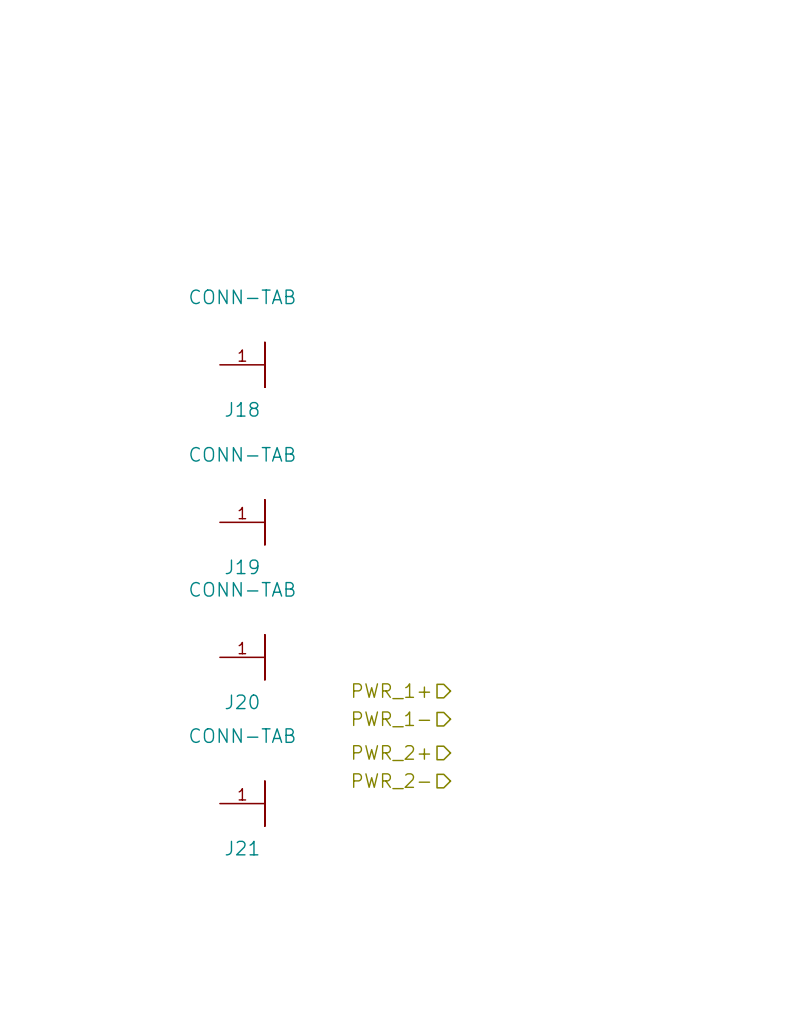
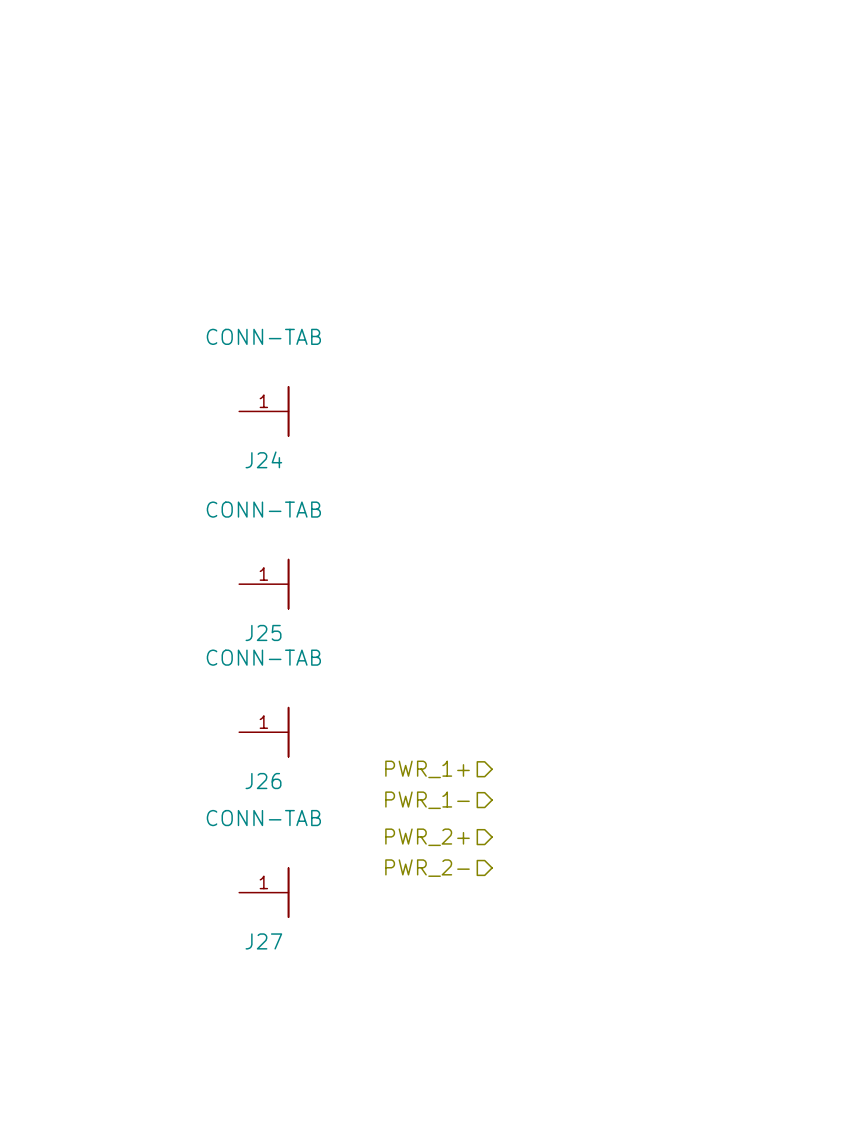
J18 name: J18 (242, 409) -> J24 (263, 459)
J19 name: J19 (242, 566) -> J25 (263, 632)
J20 name: J20 (242, 701) -> J26 (263, 781)
J21 name: J21 (242, 848) -> J27 (263, 941)

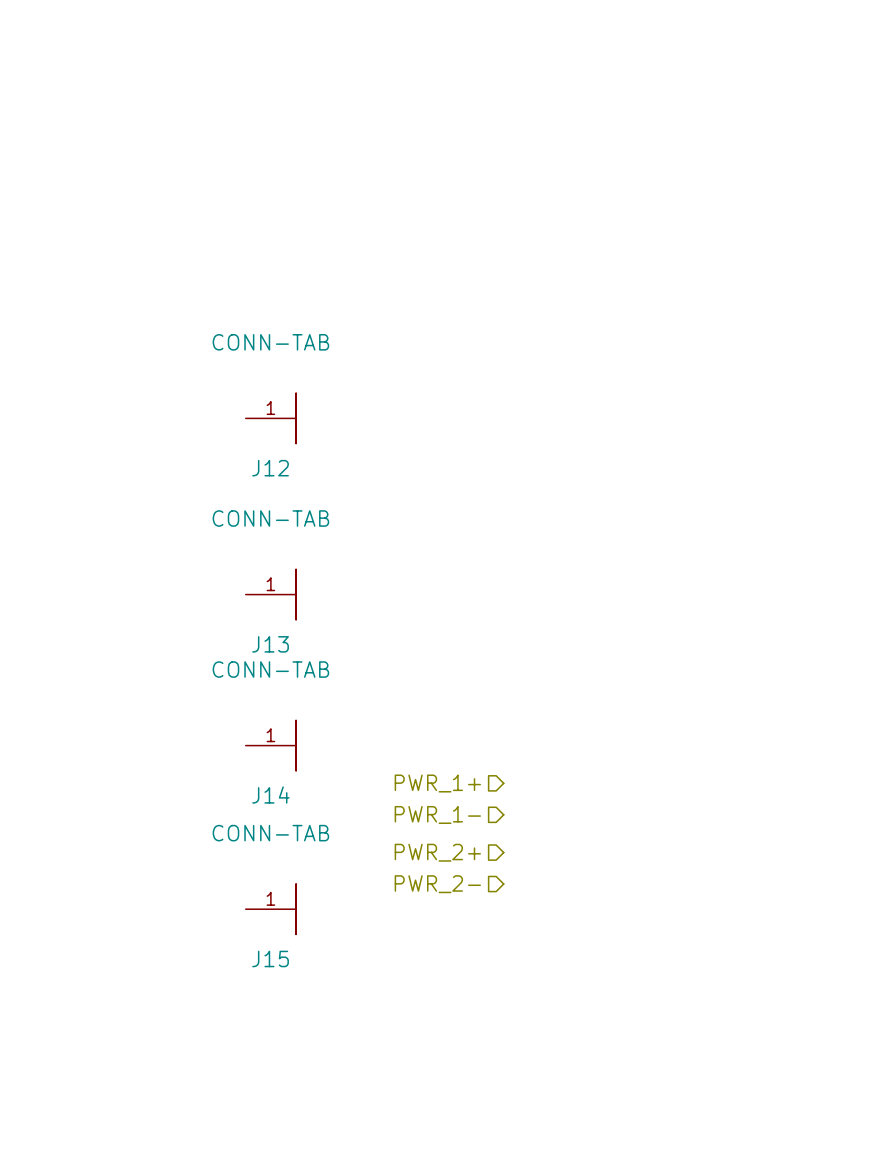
J24 name: J24 (263, 459) -> J12 (270, 468)
J25 name: J25 (263, 632) -> J13 (270, 644)
J26 name: J26 (263, 781) -> J14 (270, 795)
J27 name: J27 (263, 941) -> J15 (270, 958)

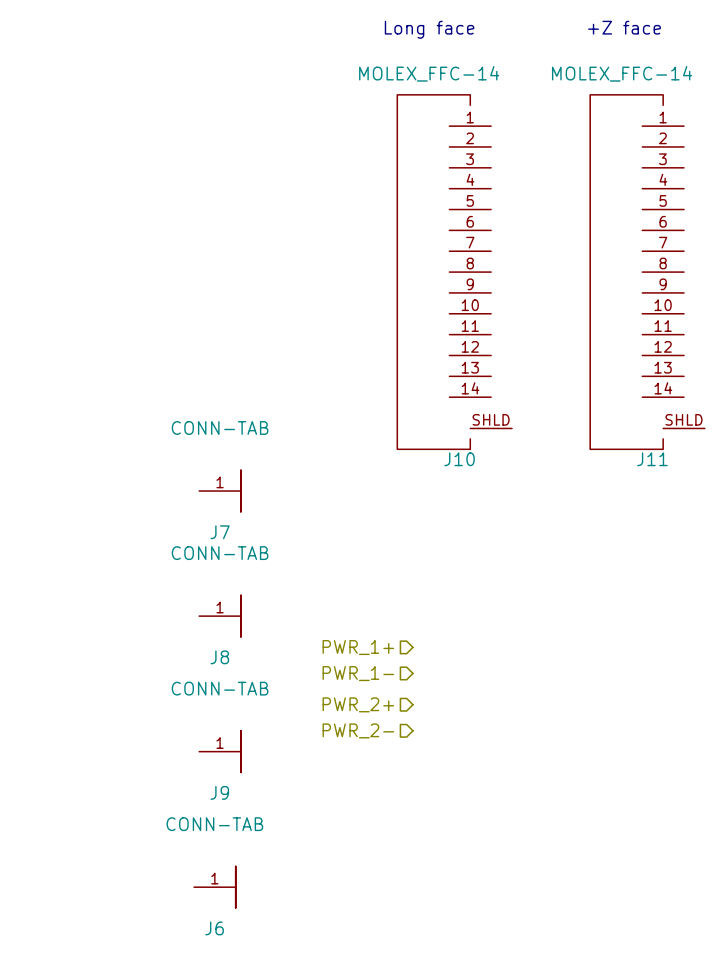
text: none -> +Z face (624, 27)
text: none -> Long face (429, 29)
J10: none -> MOLEX_FFC-14 (454, 272)
J11: none -> MOLEX_FFC-14 (647, 272)
J12: CONN-TAB (270, 418) -> none
J13 name: J13 (270, 644) -> J7 (220, 532)
J14 name: J14 (270, 795) -> J8 (219, 657)
J15 name: J15 (270, 958) -> J9 (219, 792)
J6: none -> CONN-TAB (214, 887)

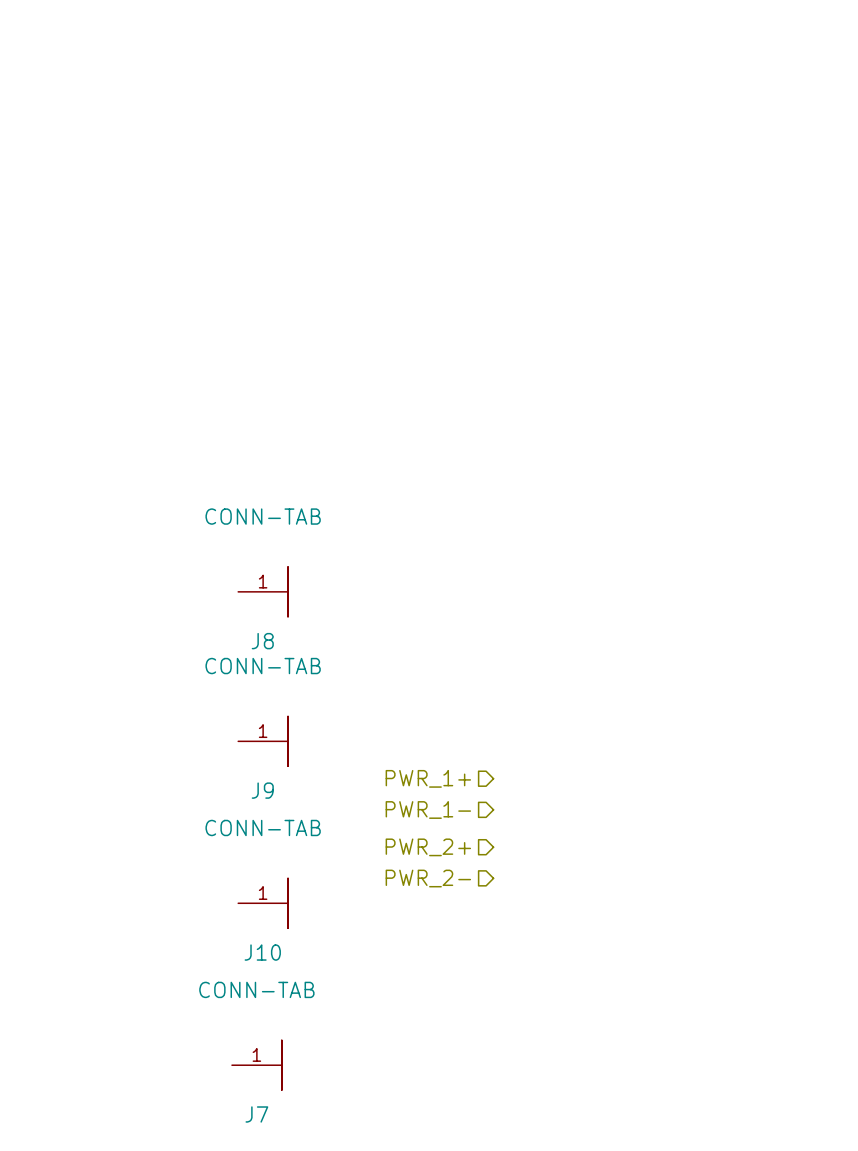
text: +Z face (624, 27) -> none
text: Long face (429, 29) -> none
J10: MOLEX_FFC-14 (454, 272) -> none
J11: MOLEX_FFC-14 (647, 272) -> none
J7 name: J7 (220, 532) -> J8 (262, 641)
J8 name: J8 (219, 657) -> J9 (262, 790)
J9 name: J9 (219, 792) -> J10 (262, 952)
J6 name: J6 (214, 928) -> J7 (256, 1114)

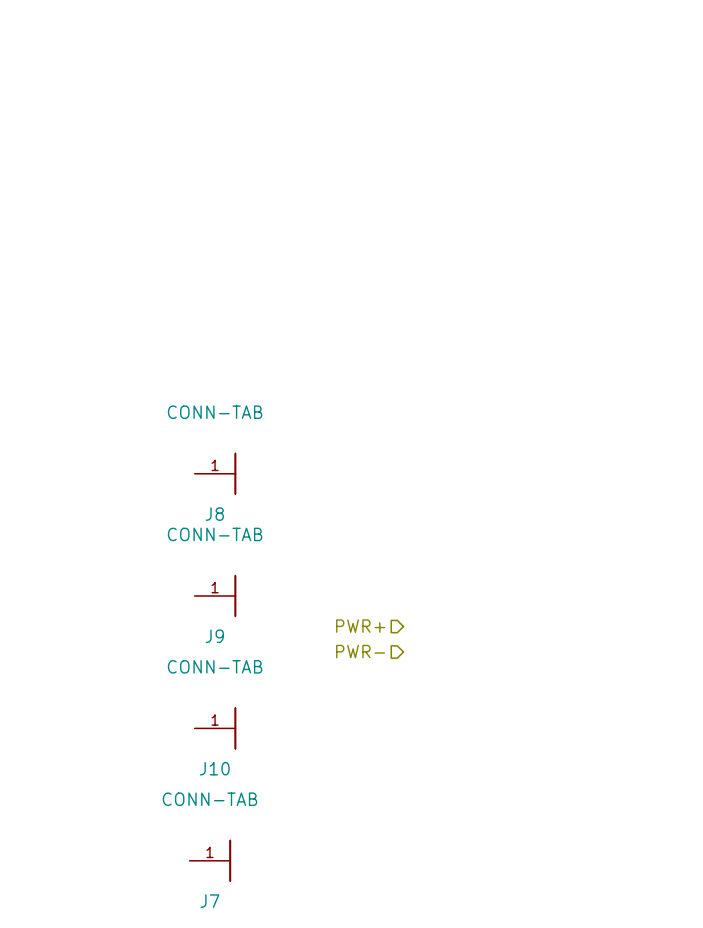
hierarchical label: PWR_1+ (428, 778) -> PWR+ (360, 626)
hierarchical label: PWR_1- (428, 810) -> PWR- (360, 651)
hierarchical label: PWR_2+ (428, 847) -> none
hierarchical label: PWR_2- (428, 878) -> none

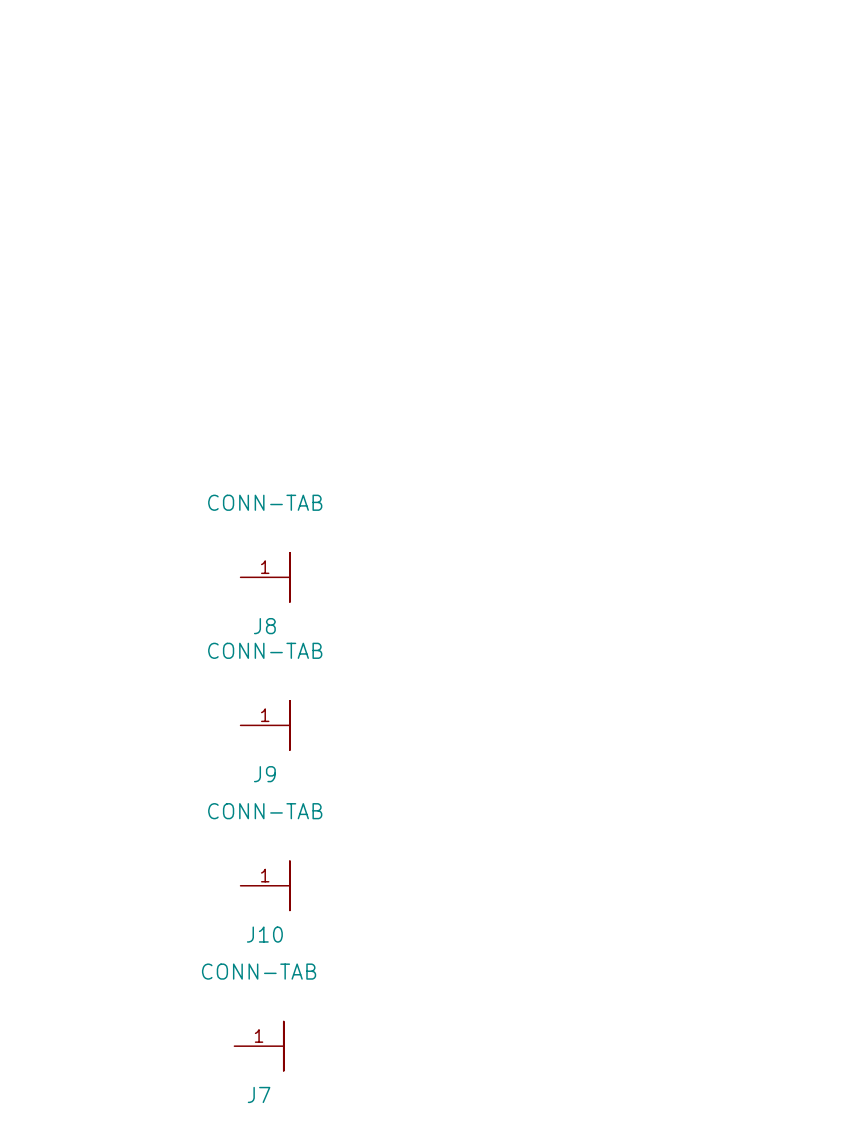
hierarchical label: PWR+ (360, 626) -> none
hierarchical label: PWR- (360, 651) -> none

